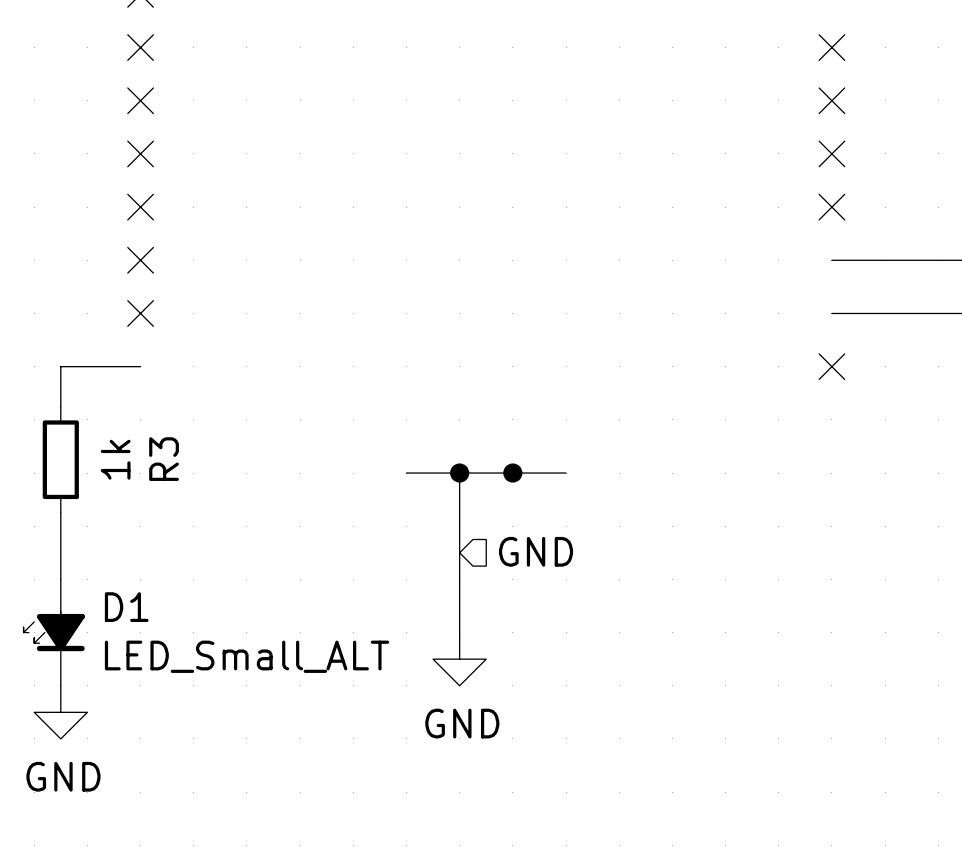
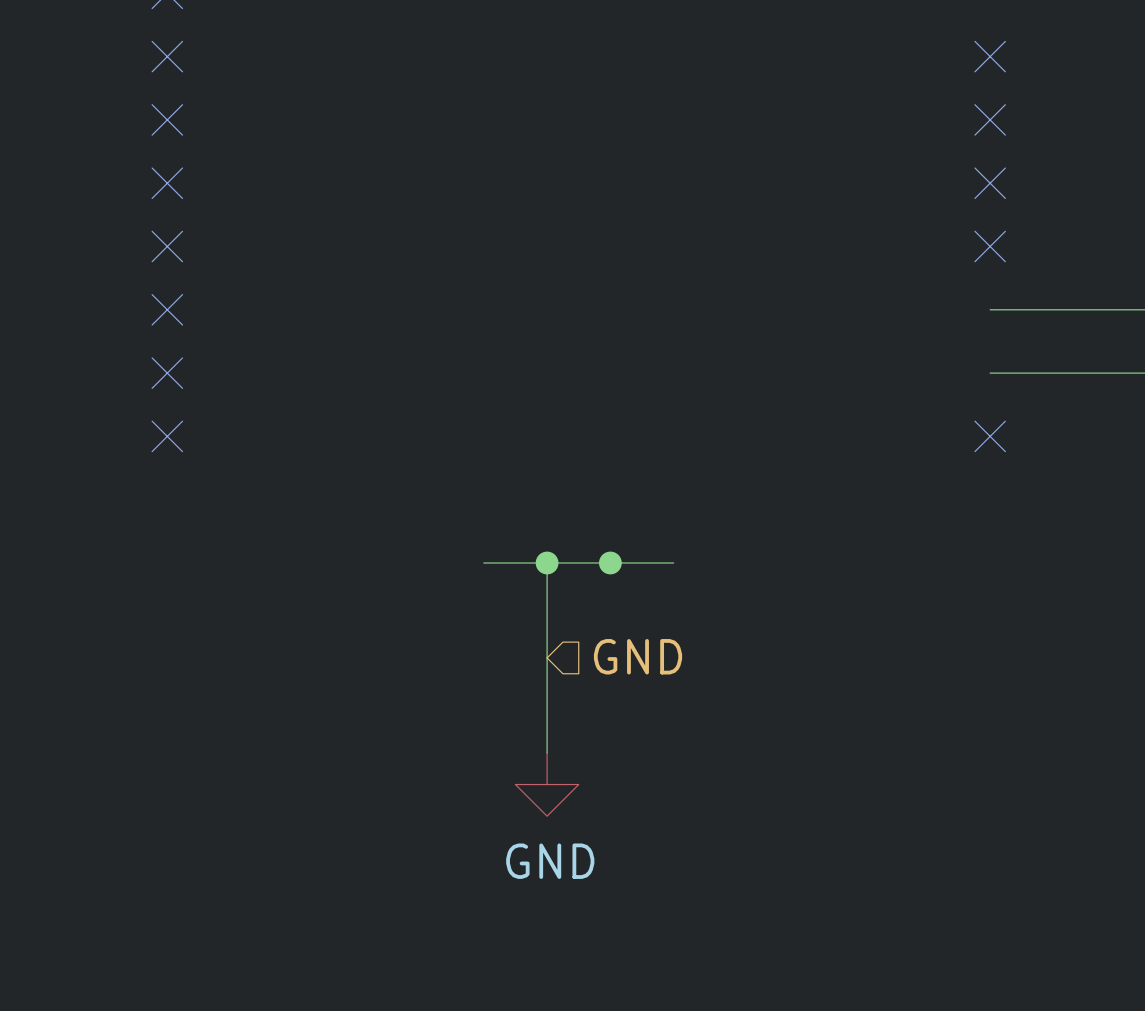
wire: (140, 366) (60, 366) (60, 406) -> none
no-connect mark: none -> (167, 436)
R3: 1k (60, 459) -> none
wire: (60, 512) (60, 579) -> none
D1: LED_Small_ALT (54, 632) -> none
power symbol: GND (60, 712) -> none

